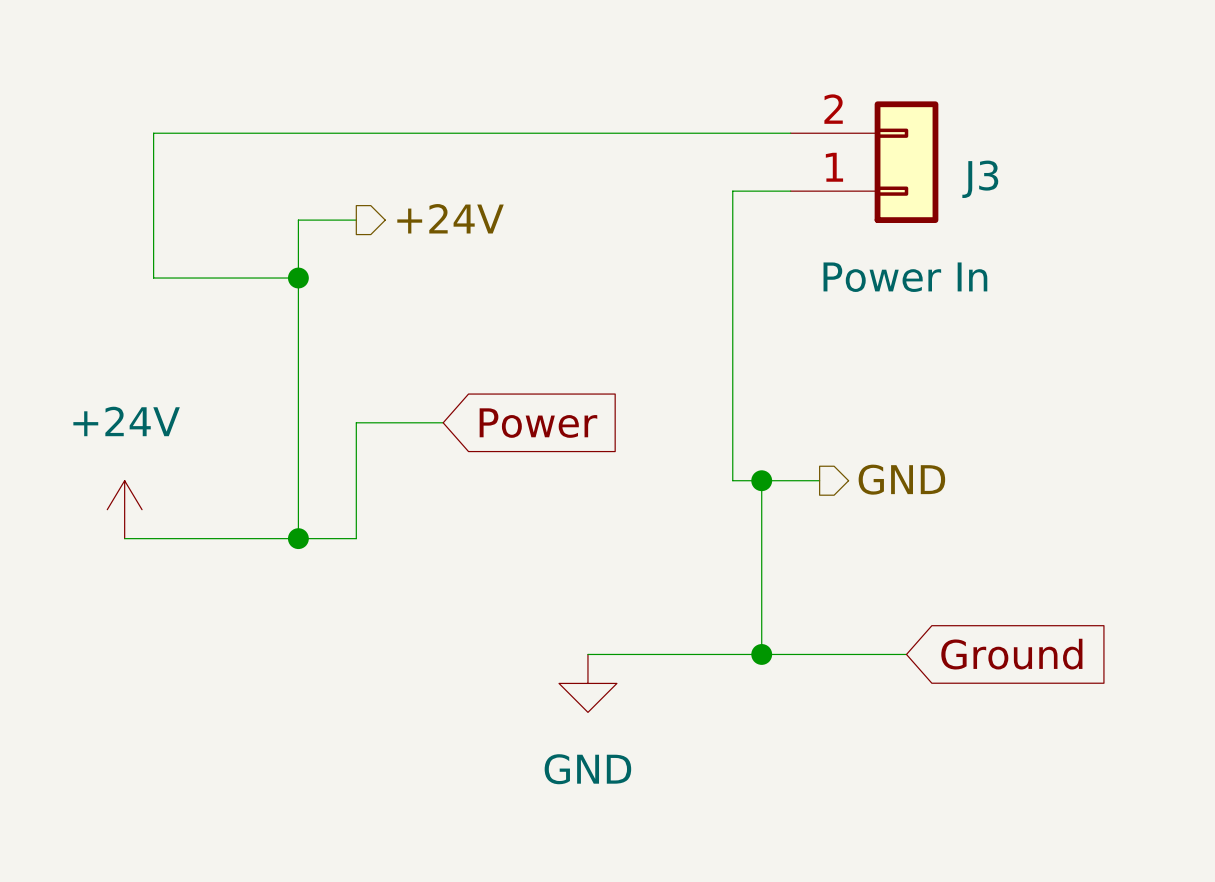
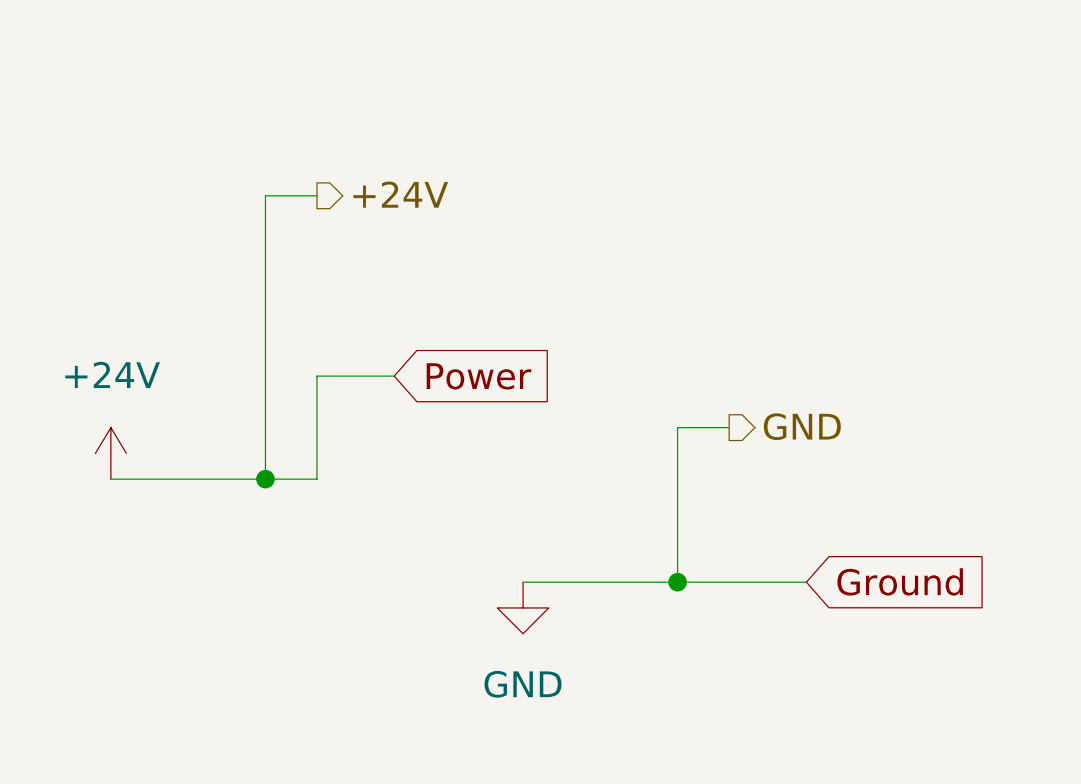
wire: (790, 133) (153, 133) (153, 278) (298, 278) -> none
J3: Power In (864, 162) -> none
wire: (790, 191) (732, 191) (732, 480) (761, 480) -> none
junction: (298, 278) -> none
junction: (761, 480) -> none

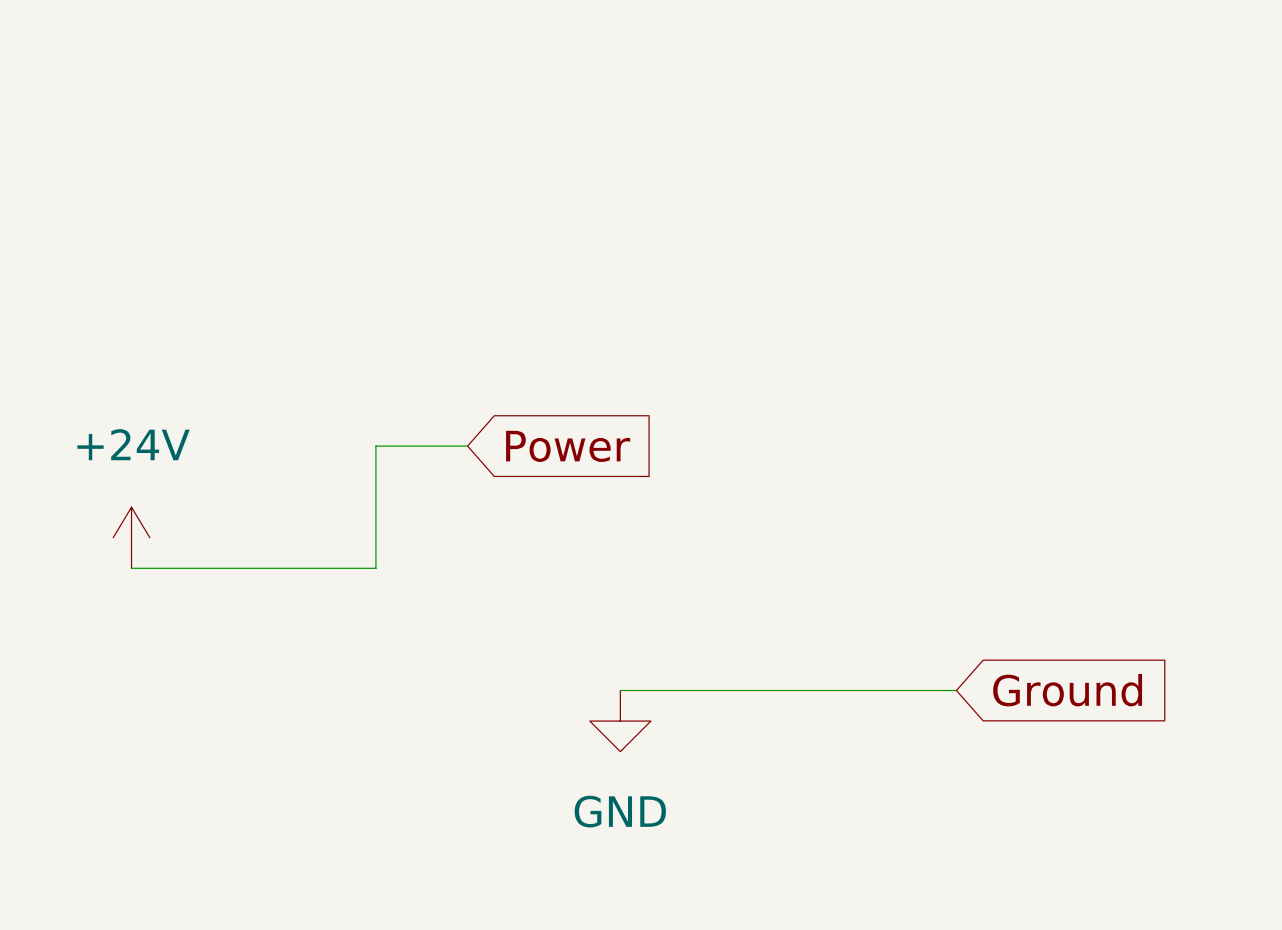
hierarchical label: +24V (400, 194) -> none
wire: (316, 195) (265, 195) (265, 479) -> none
hierarchical label: GND (802, 426) -> none
wire: (729, 427) (677, 427) (677, 582) -> none
junction: (265, 479) -> none
junction: (677, 582) -> none

